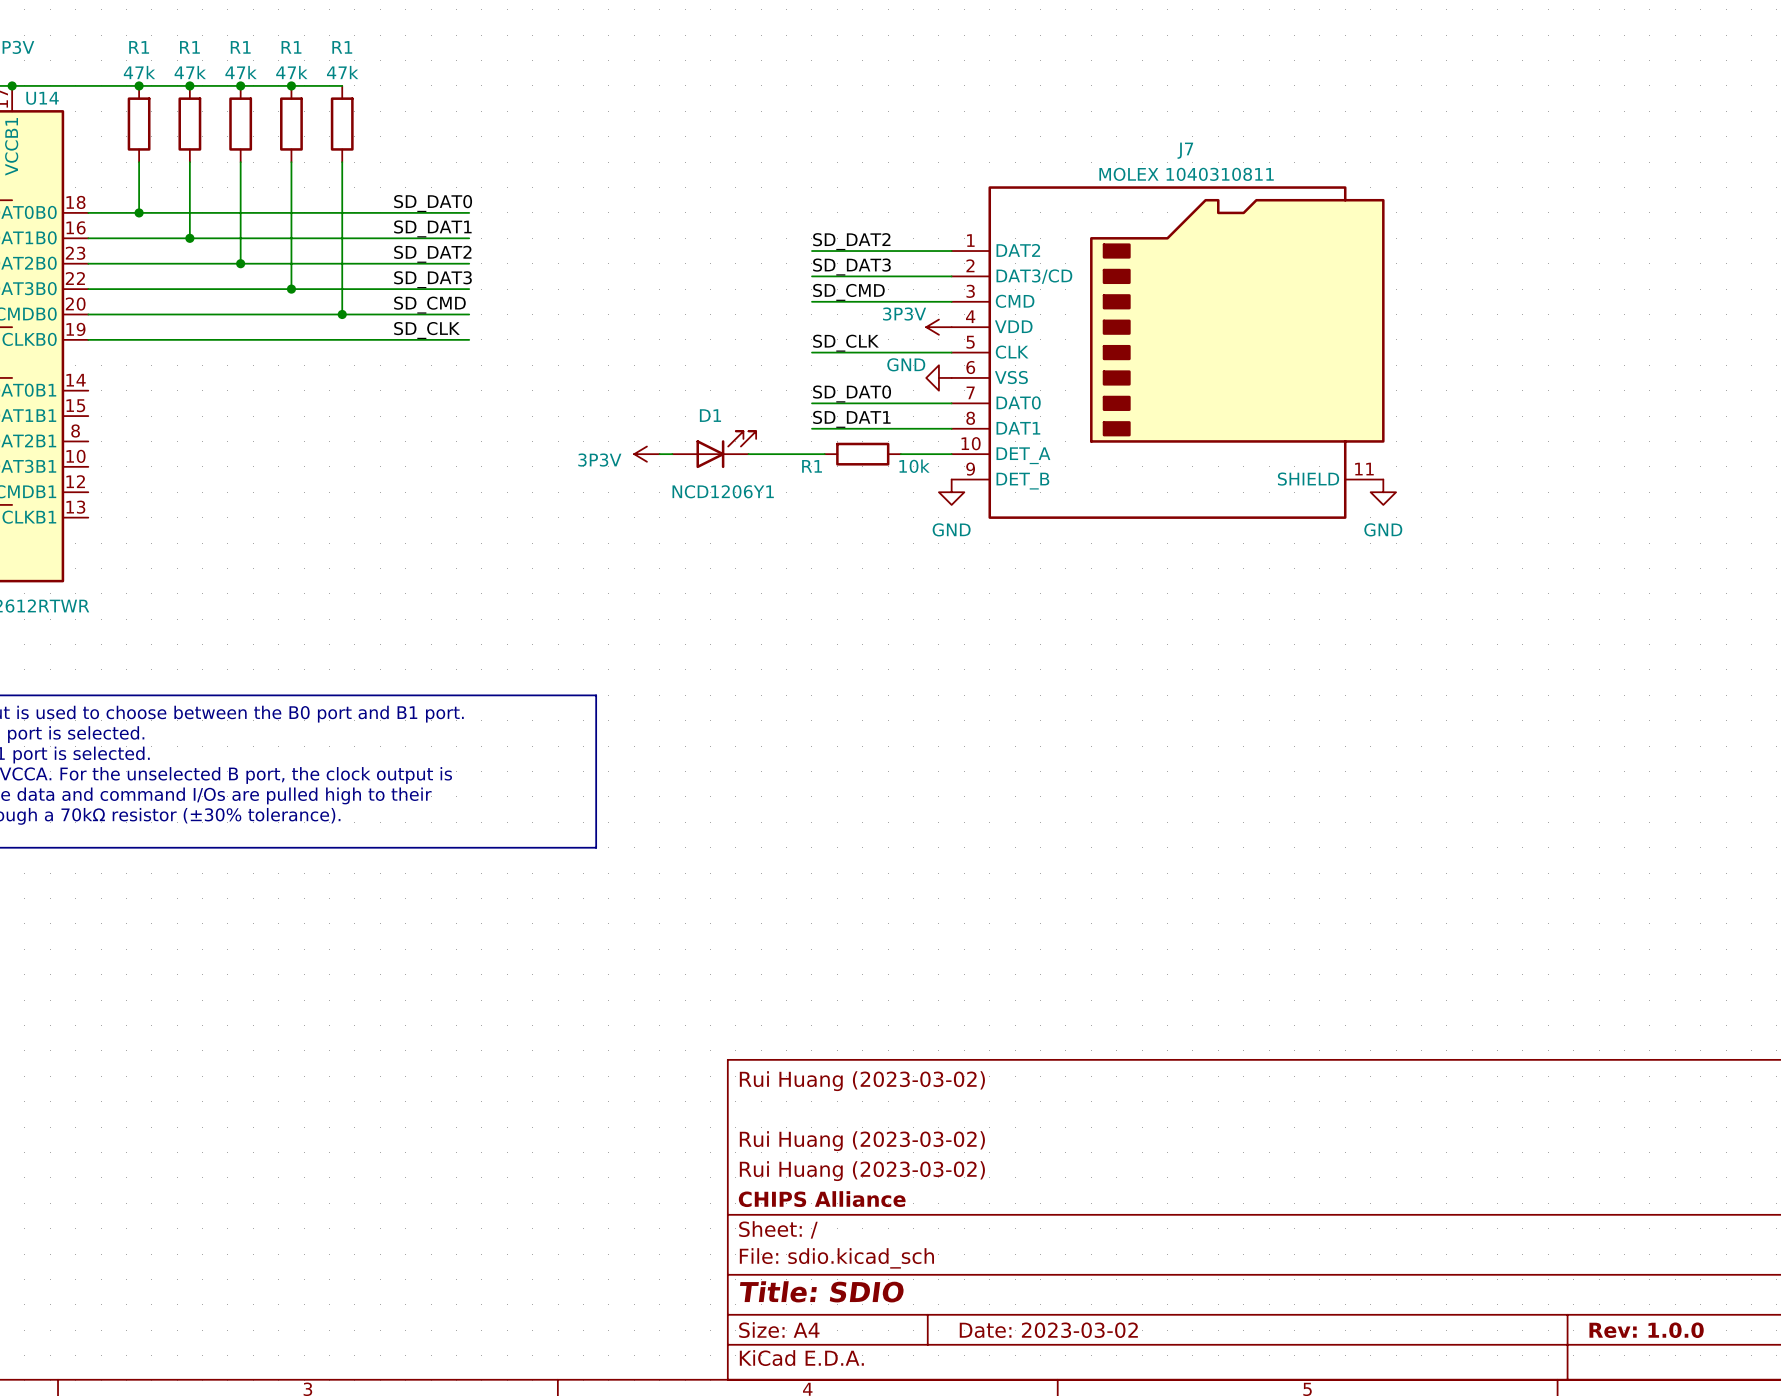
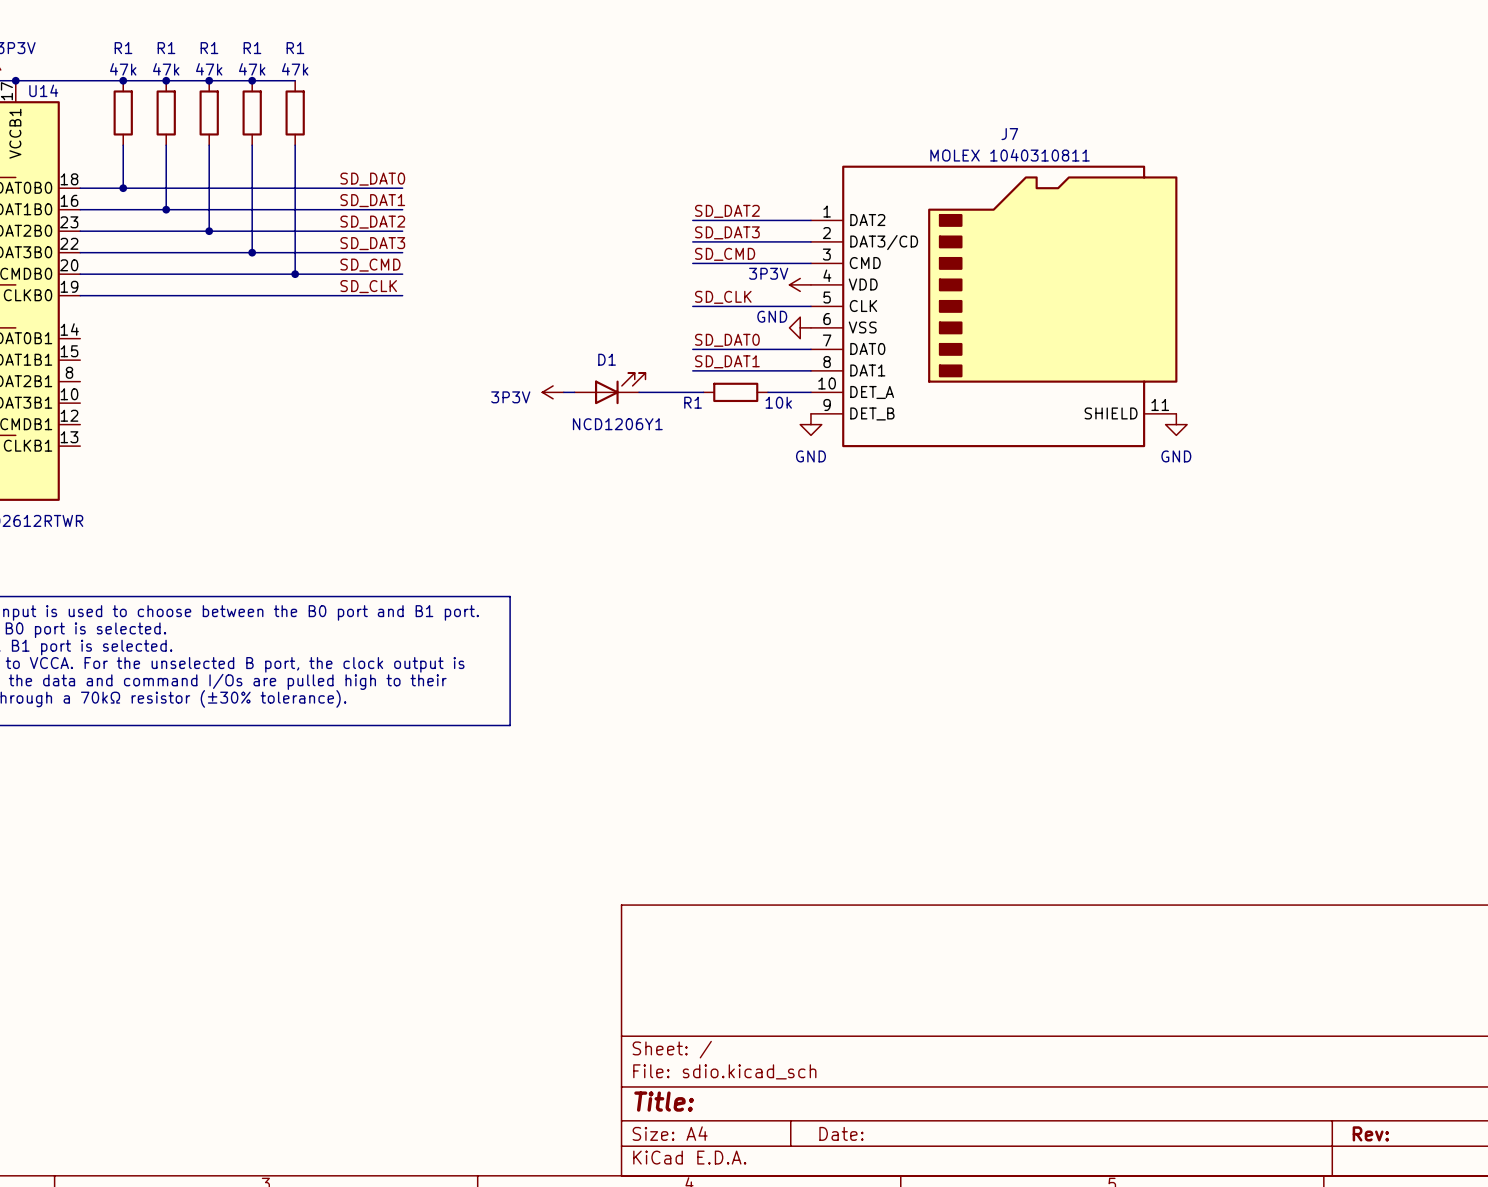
title block: Rui Huang (2023-03-02) (862, 1081) -> none
title block: Rui Huang (2023-03-02) (862, 1141) -> none
title block: Rui Huang (2023-03-02) (862, 1171) -> none
title block: CHIPS Alliance (822, 1199) -> none
title block: Title: SDIO (822, 1291) -> Title: (664, 1101)
title block: Date: 2023-03-02 (1048, 1330) -> Date: (841, 1133)
title block: Rev: 1.0.0 (1646, 1330) -> Rev: (1370, 1133)

